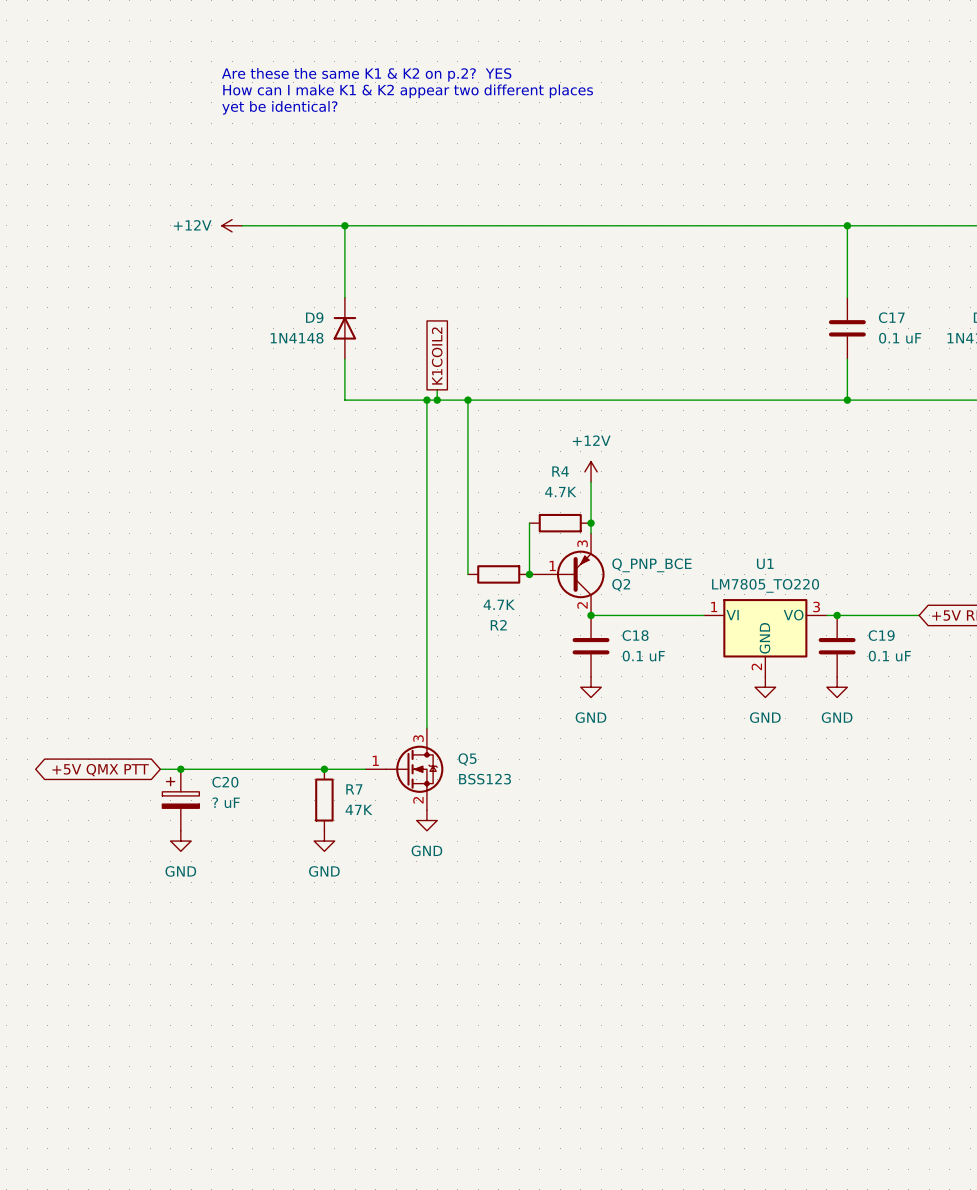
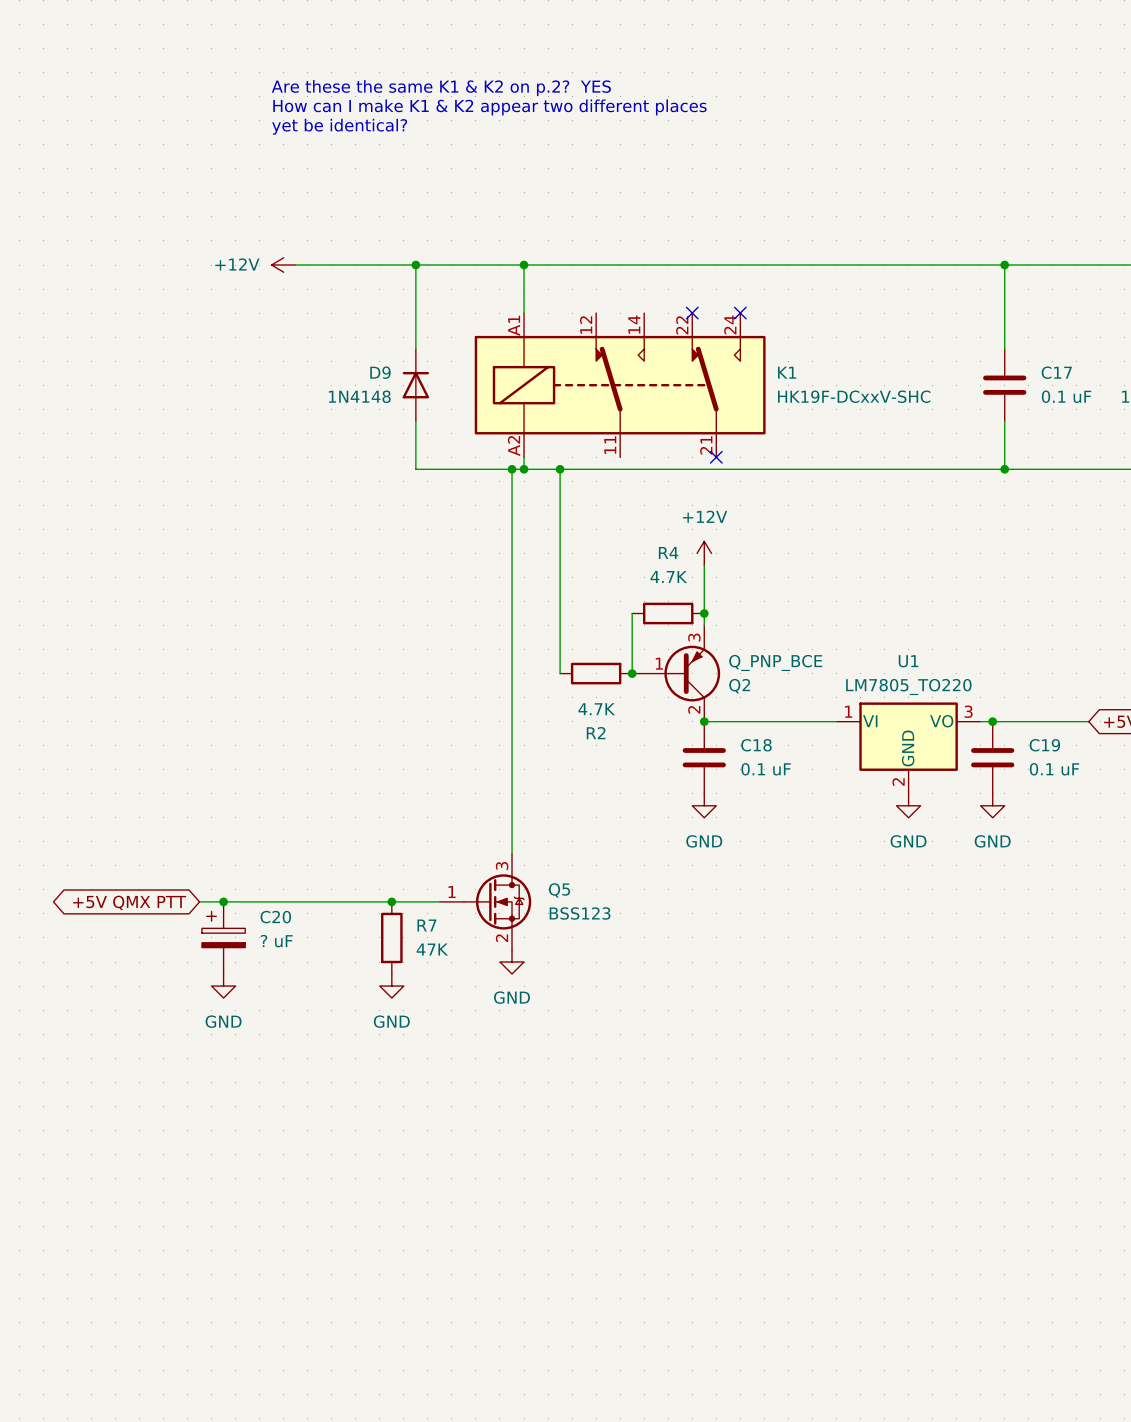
wire: none -> (524, 265) (524, 313)
junction: none -> (524, 265)
no-connect mark: none -> (692, 313)
no-connect mark: none -> (740, 313)
K1: none -> HK19F-DCxxV-SHC (620, 385)
global label: K1COIL2 (437, 356) -> none
no-connect mark: none -> (716, 457)

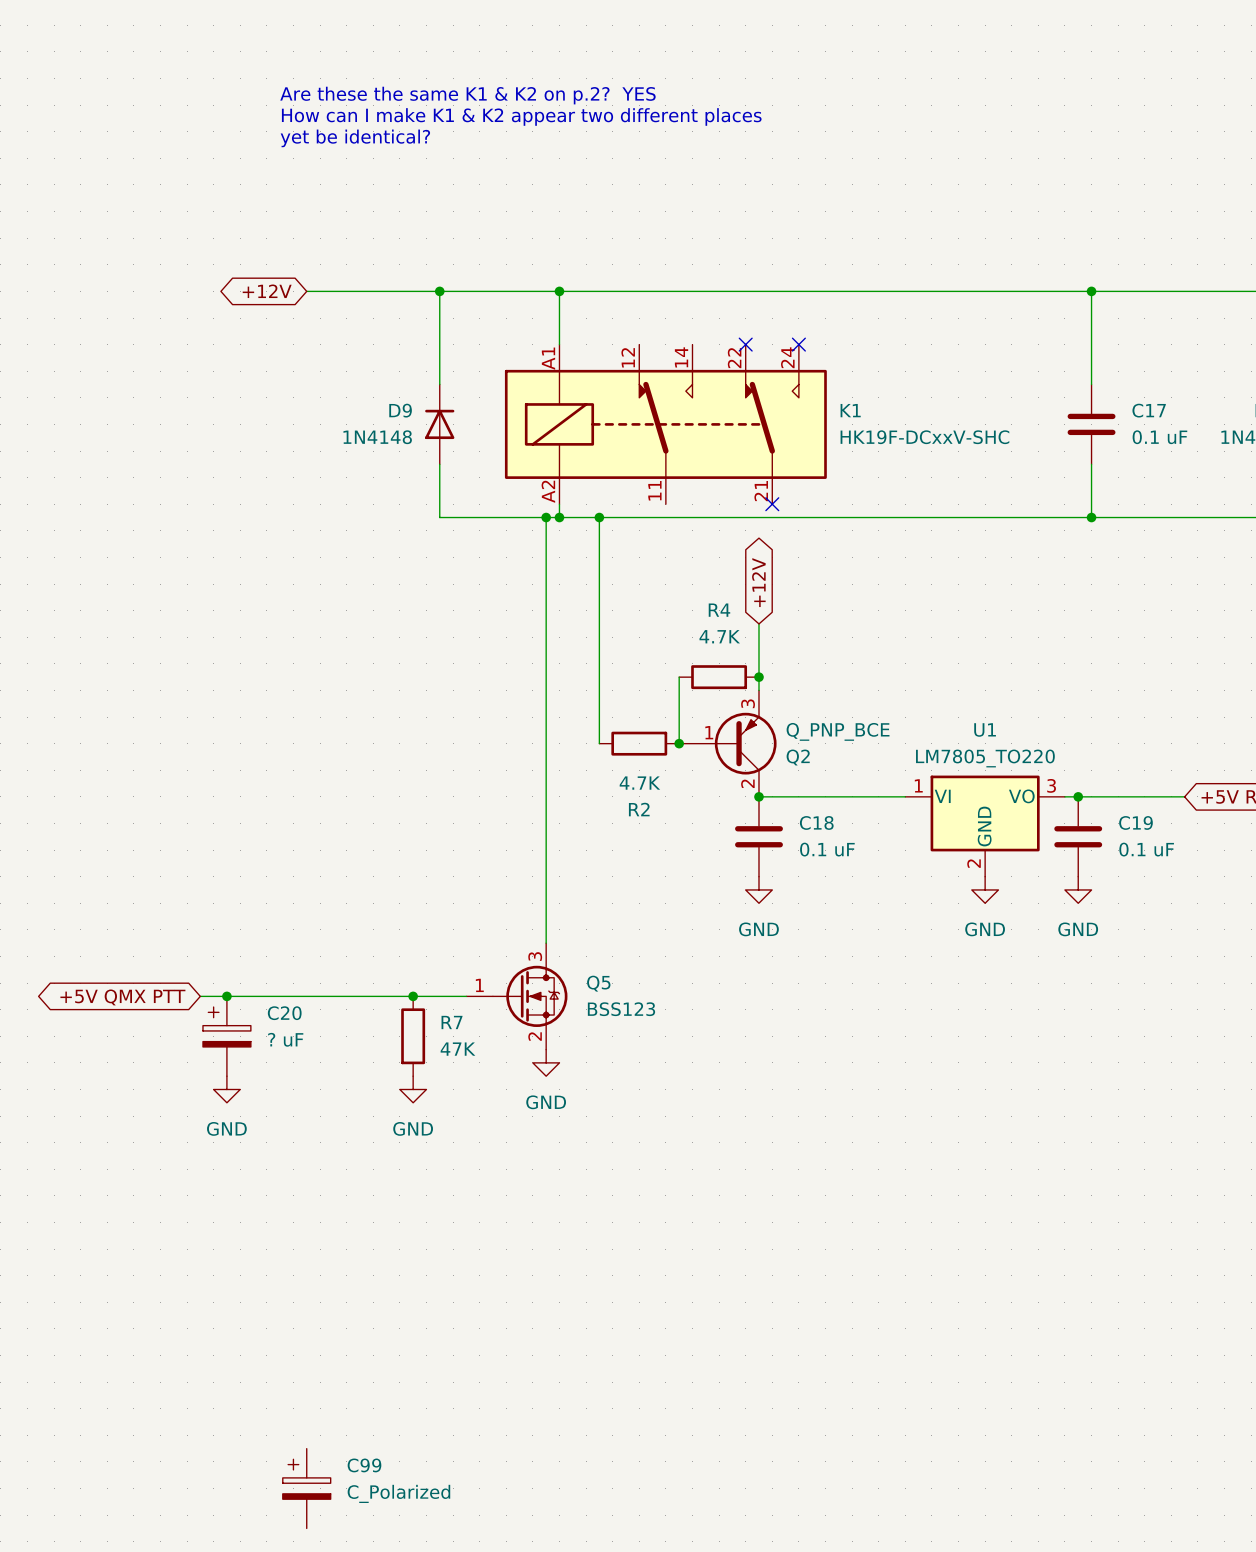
global label: none -> +12V (267, 291)
power symbol: +12V (283, 265) -> none
global label: none -> +12V (758, 582)
power symbol: +12V (704, 553) -> none
C99: none -> C_Polarized (306, 1488)

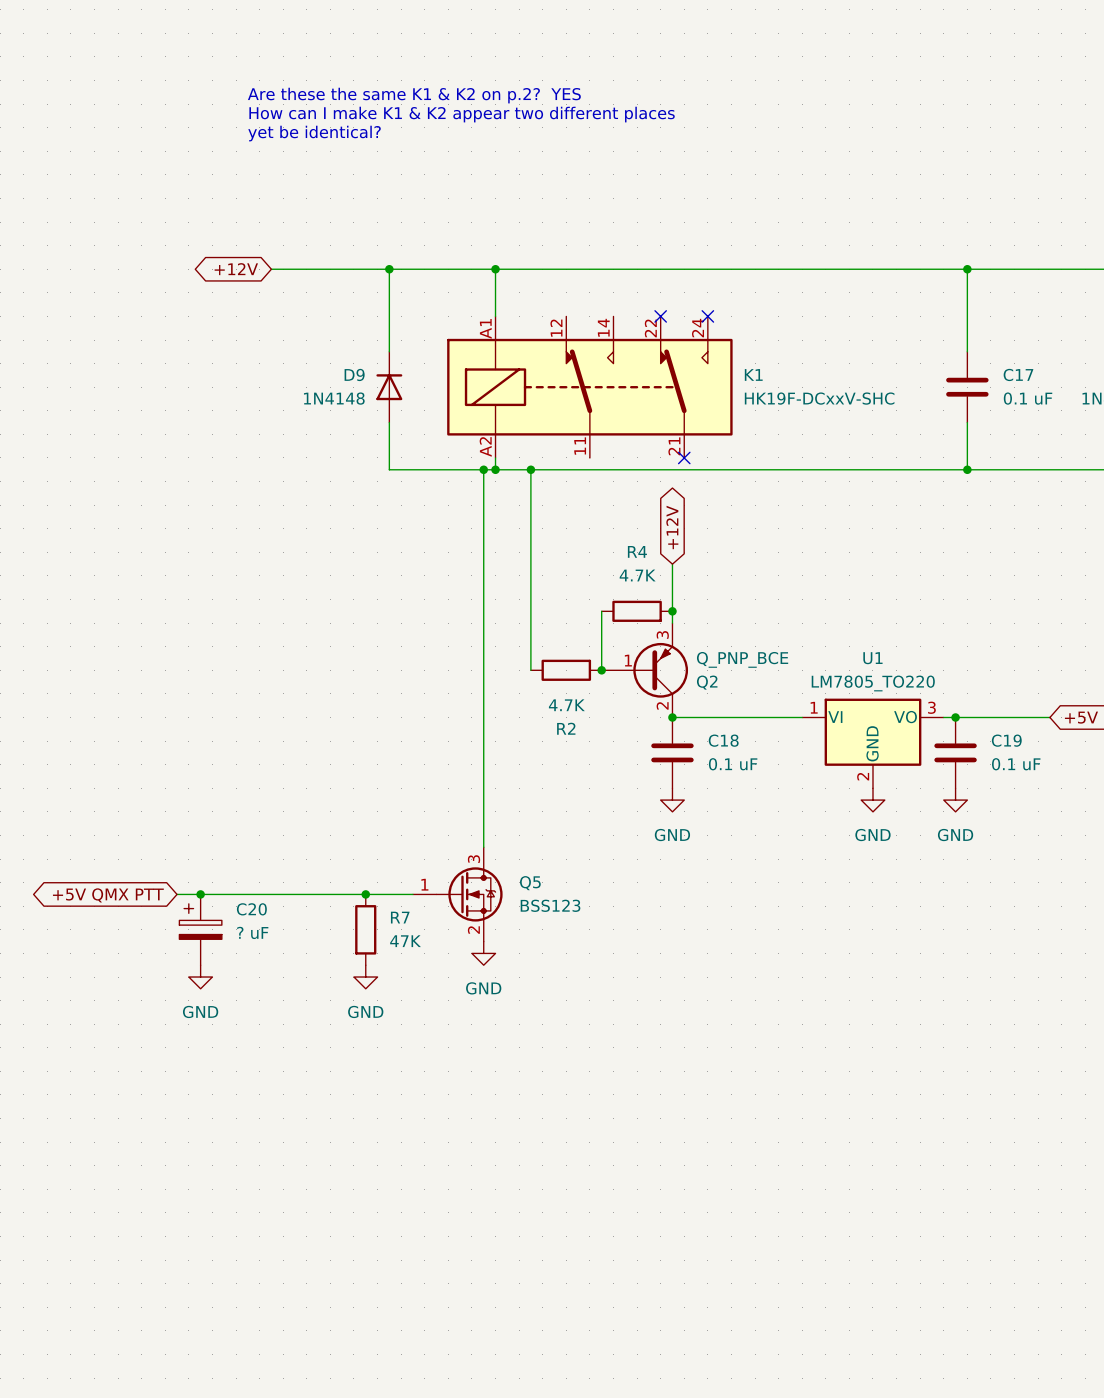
C99: C_Polarized (306, 1488) -> none

